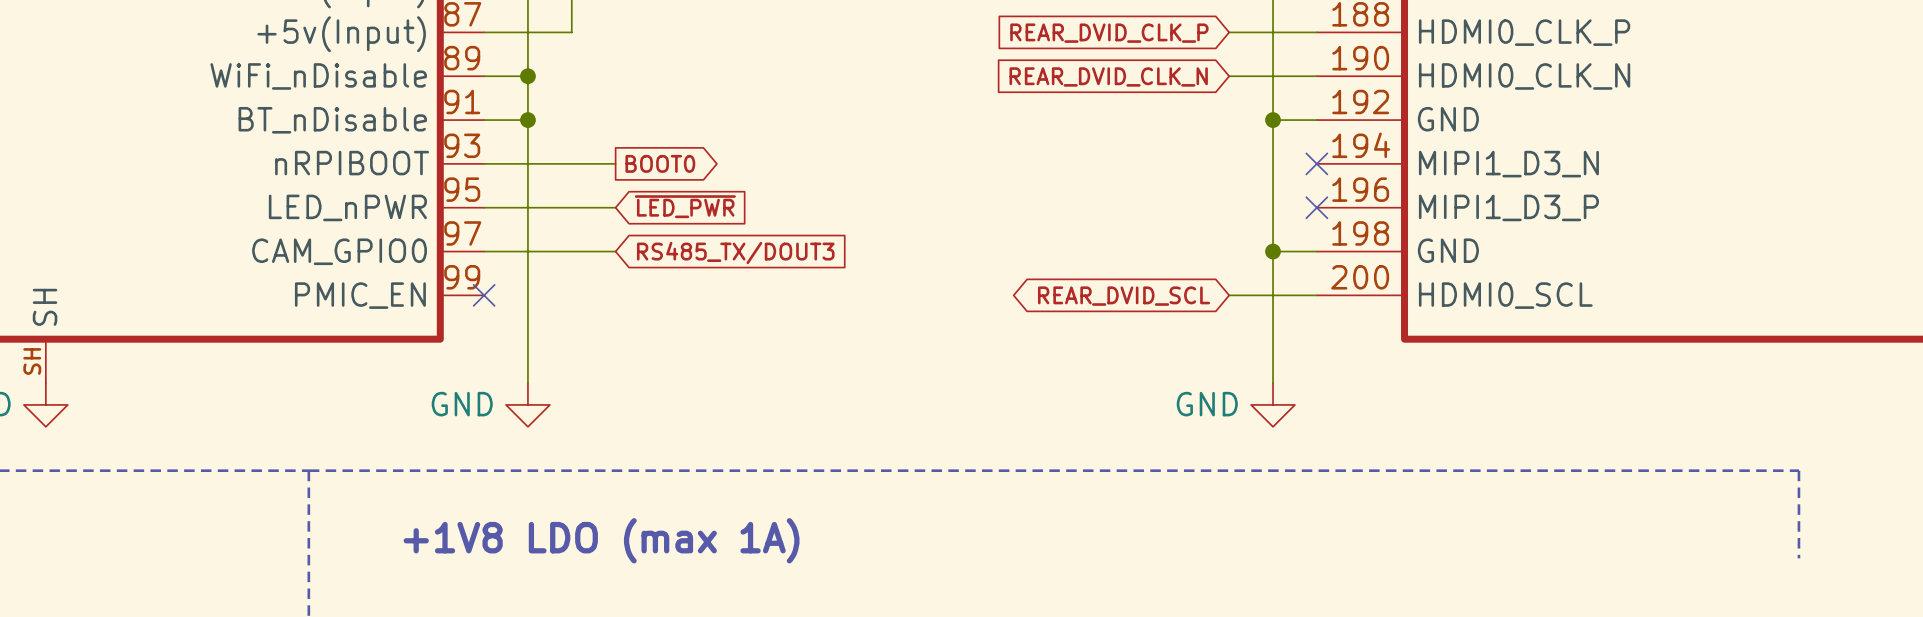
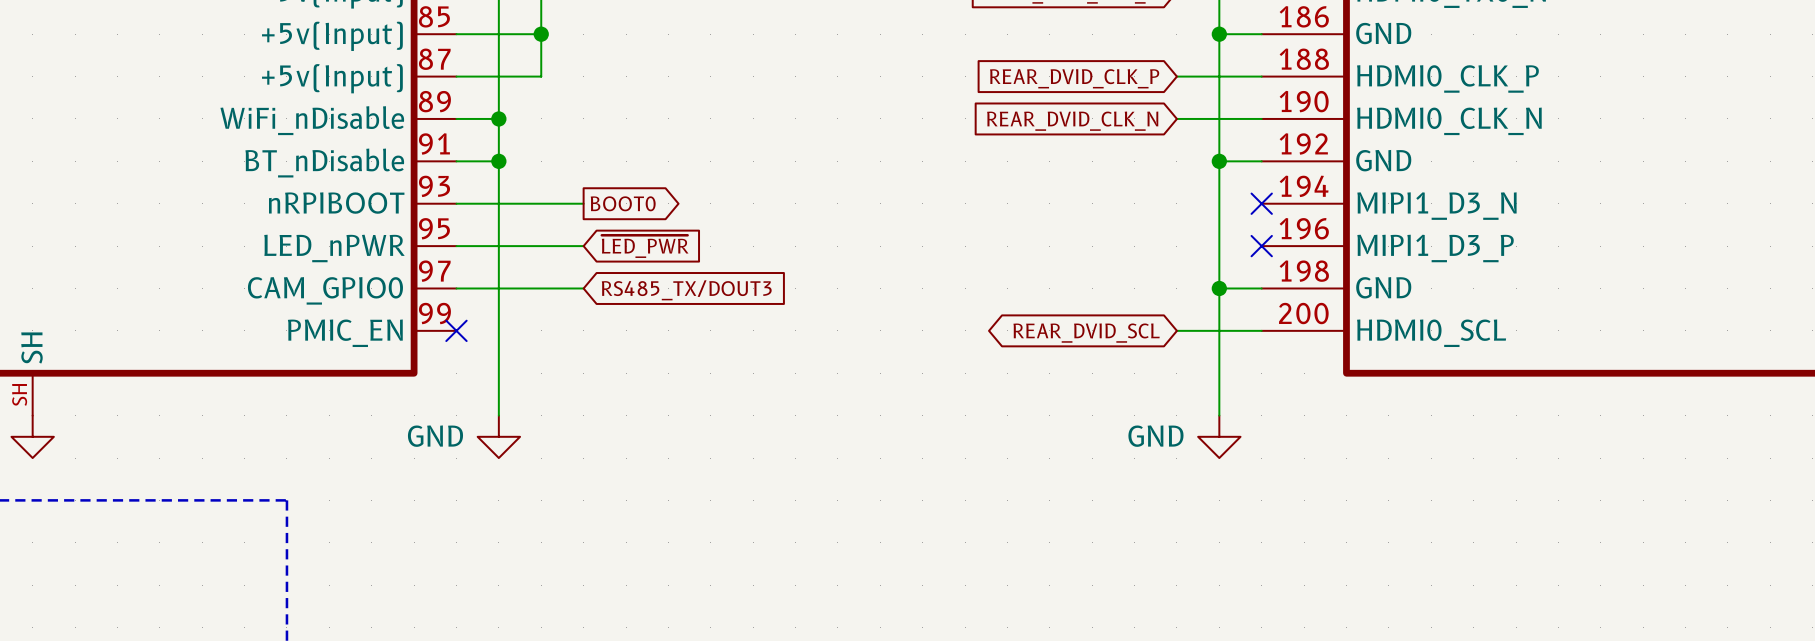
line: (308, 470) (1798, 470) (1798, 558) -> none
text: +1V8 LDO (max 1A) (601, 540) -> none

